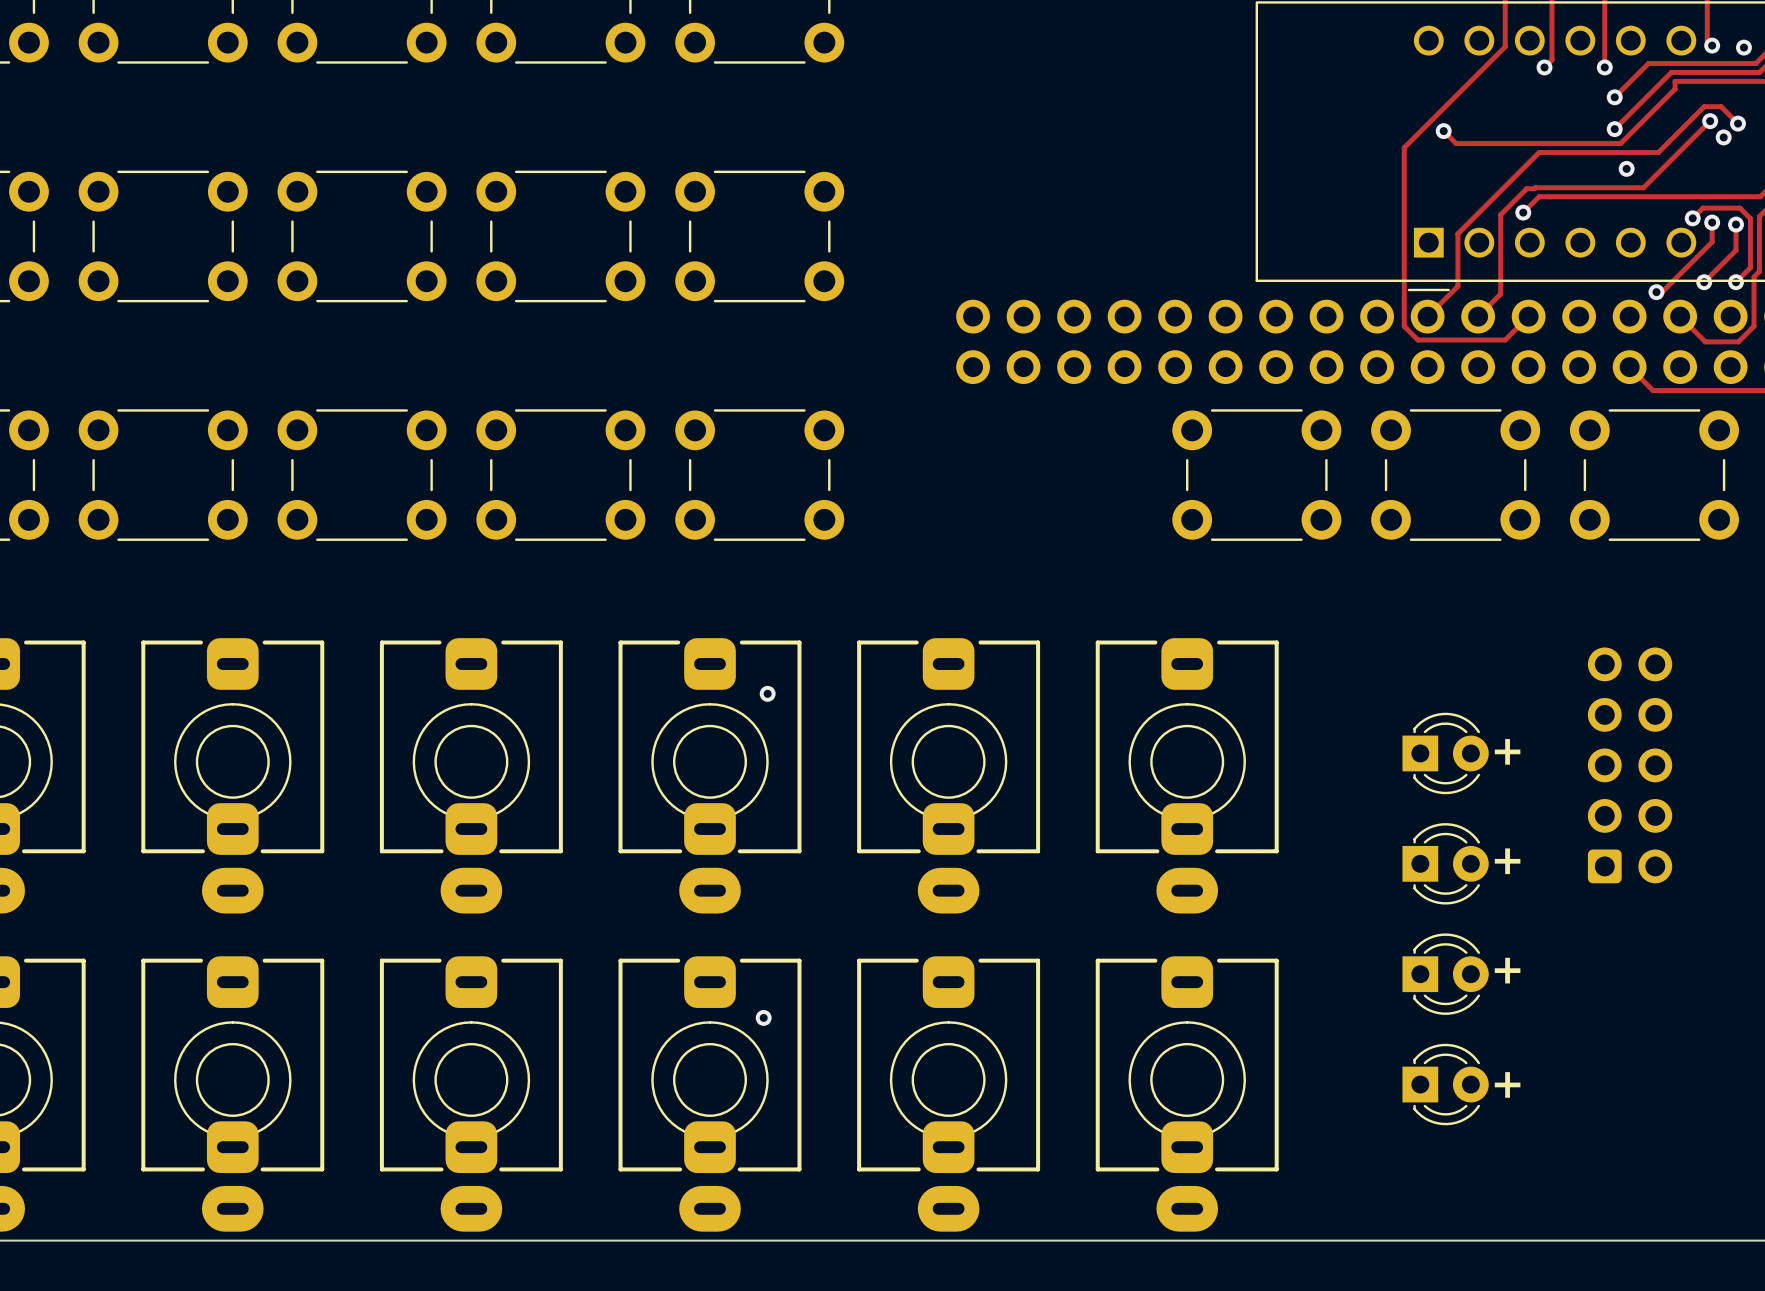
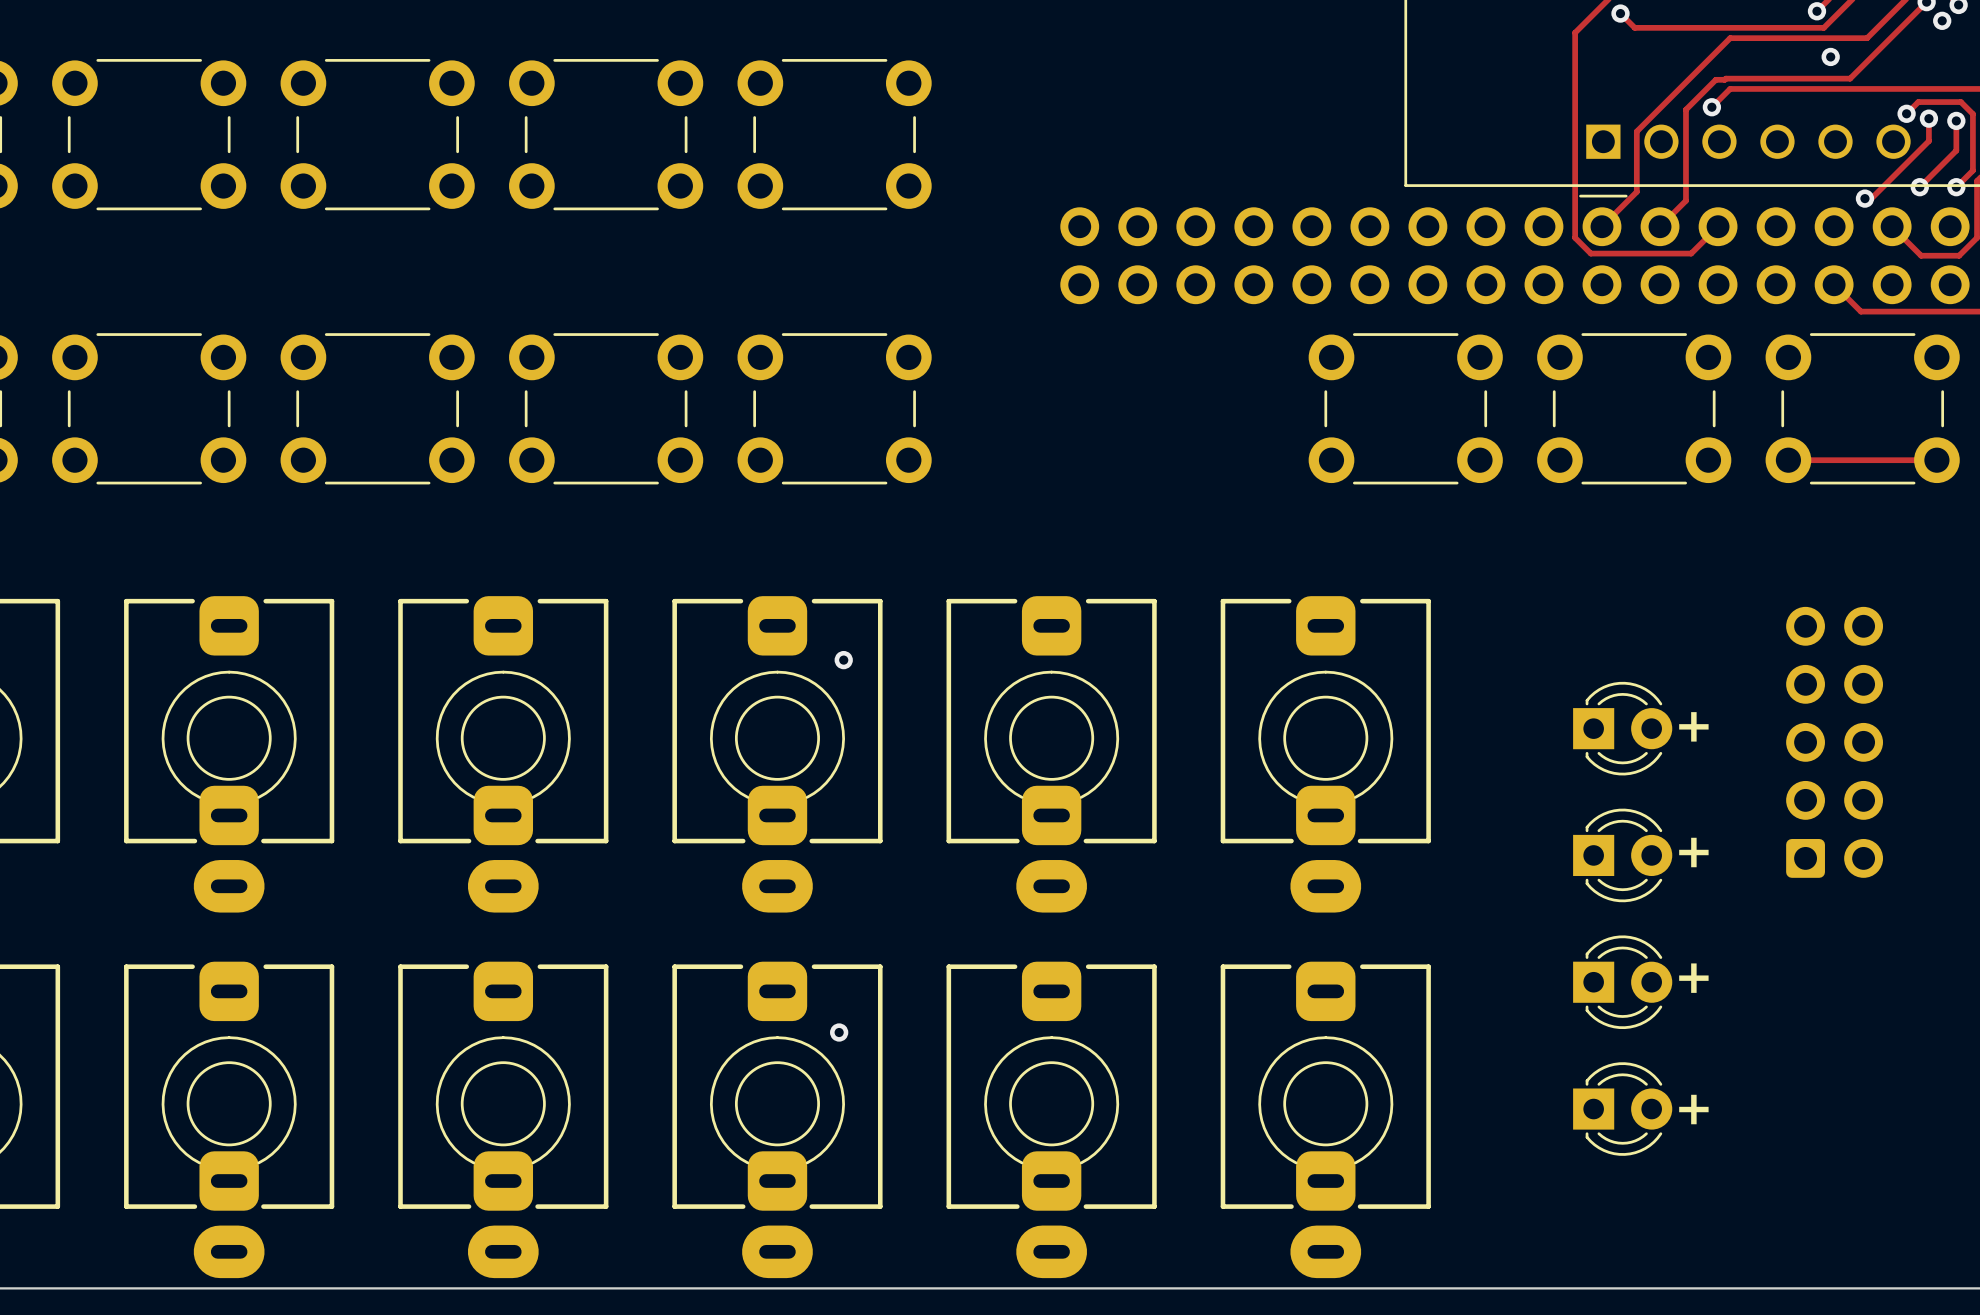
track: none -> (1788, 460) (1936, 460)

